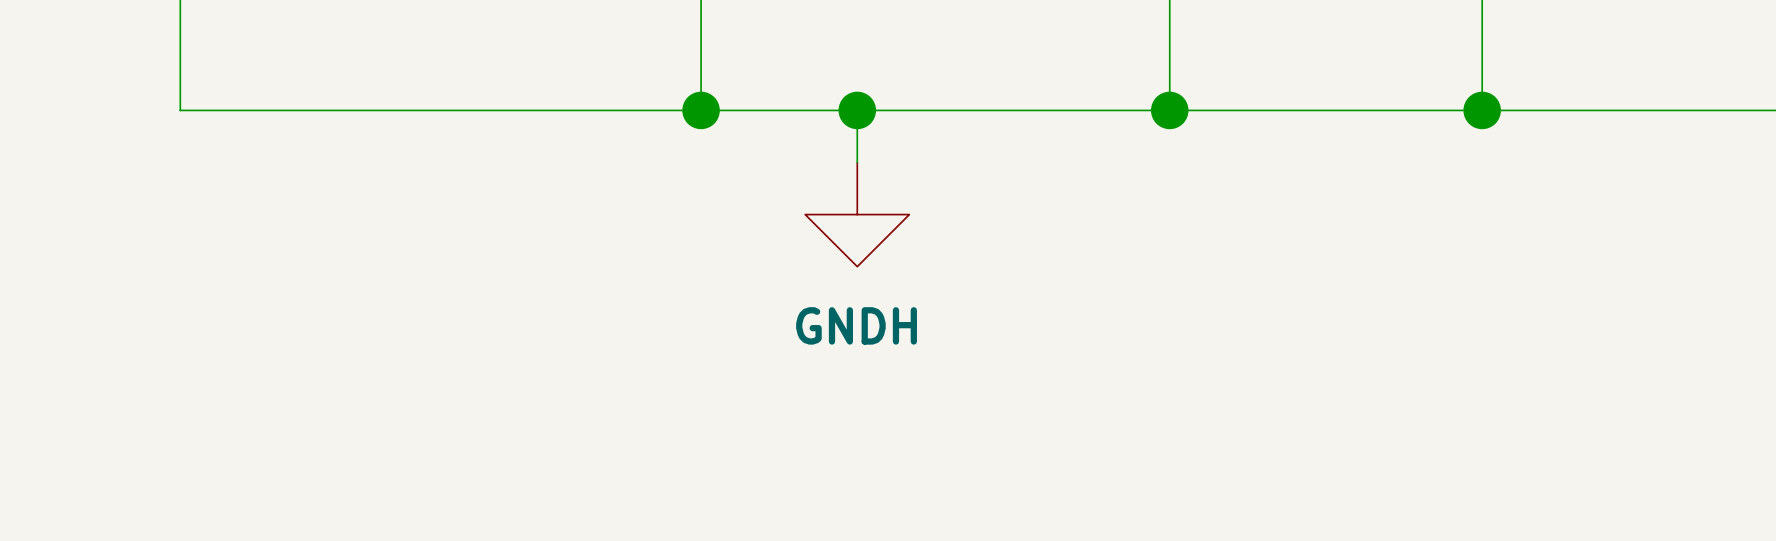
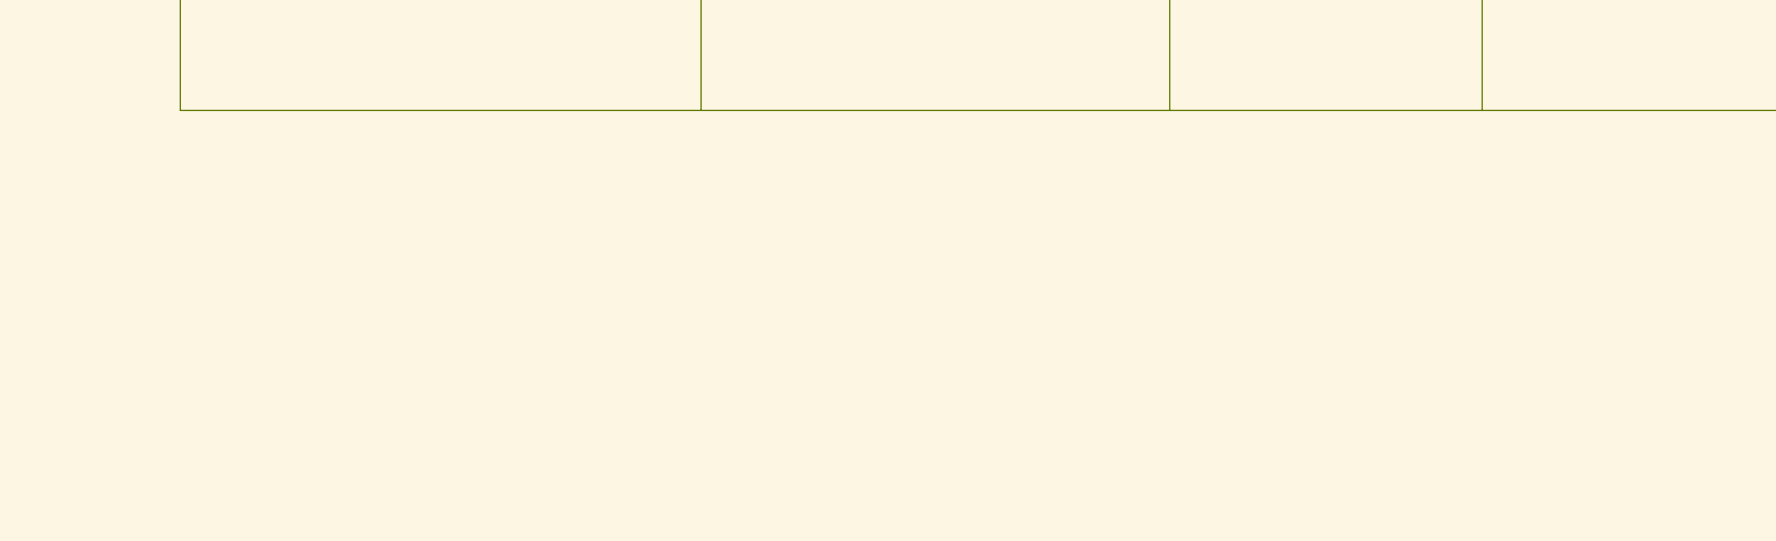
junction: (701, 110) -> none
wire: (857, 110) (857, 162) -> none
junction: (857, 110) -> none
junction: (1169, 110) -> none
junction: (1482, 110) -> none
power symbol: GNDH (857, 214) -> none

